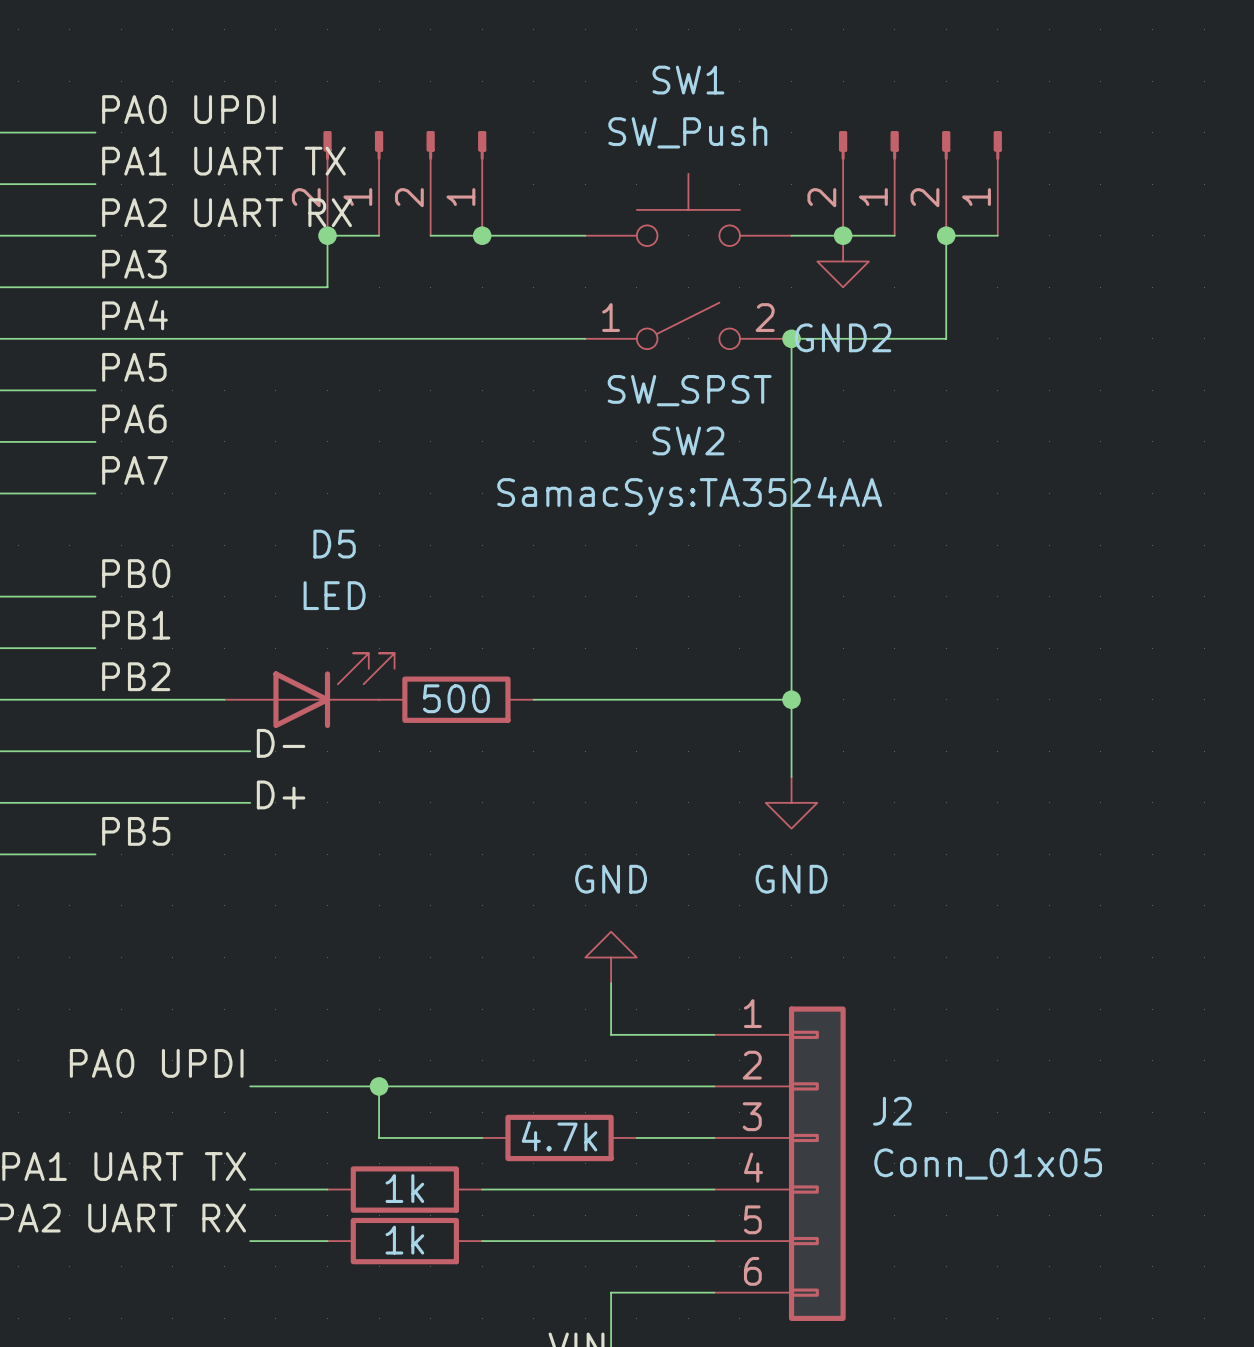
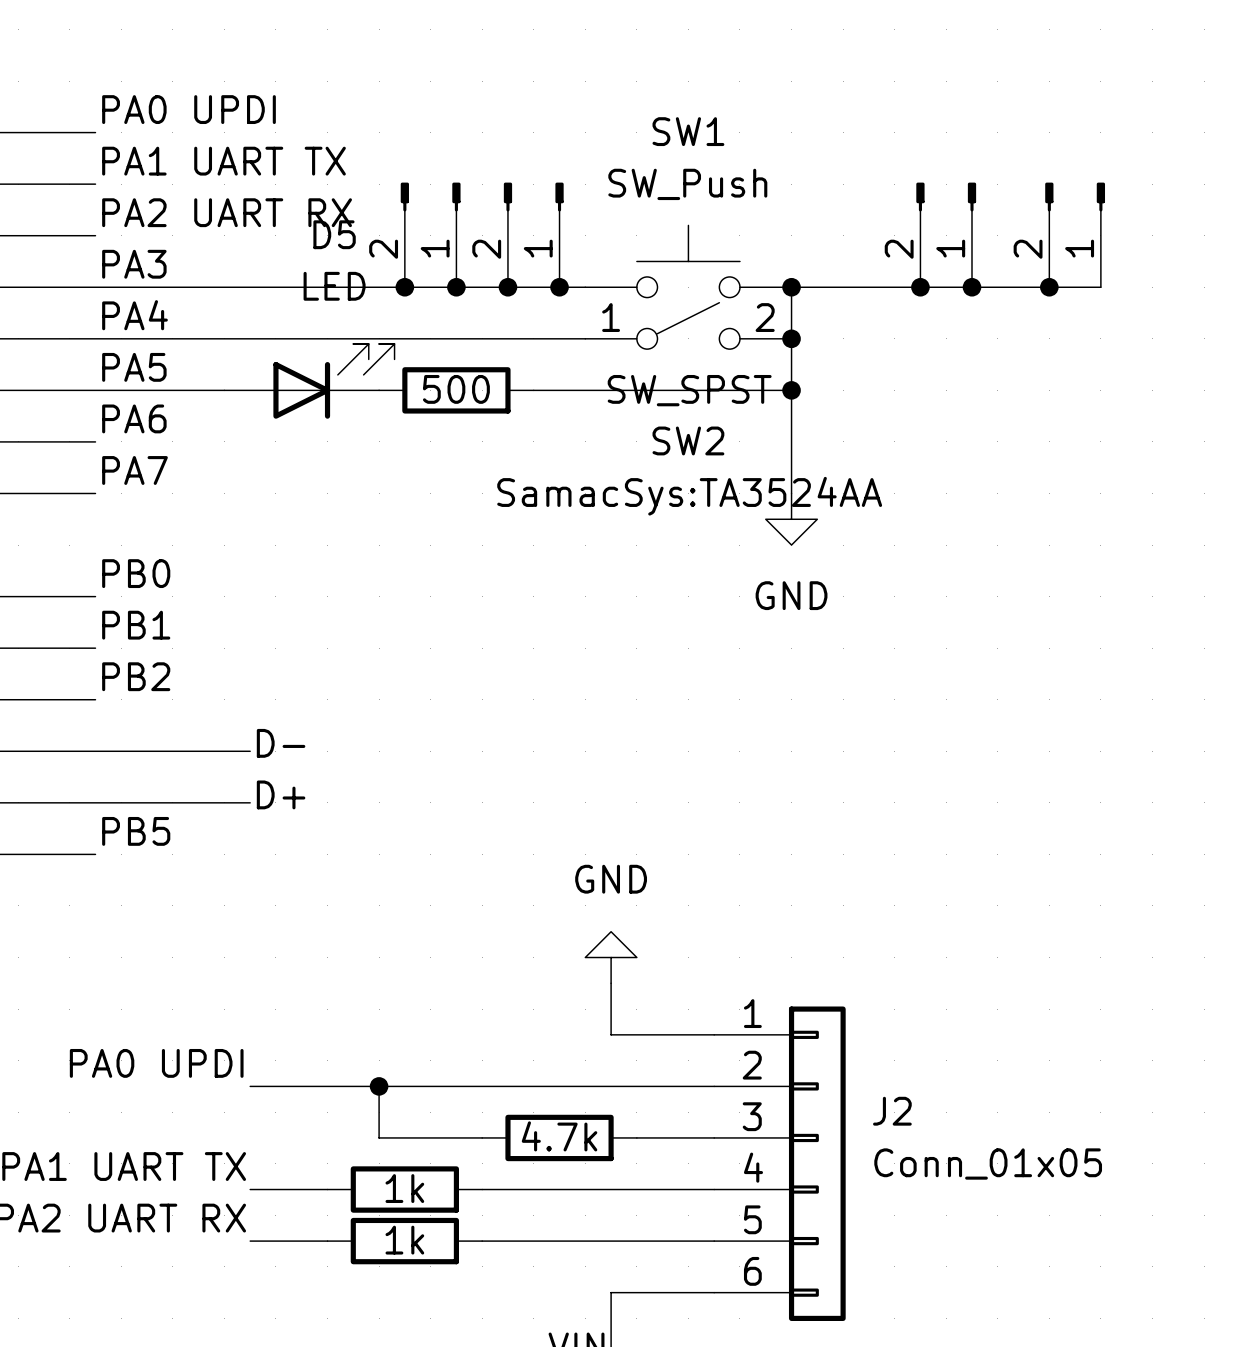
part: (353, 183) -> none
part: (456, 183) -> none
part: (868, 183) -> none
part: (972, 183) -> none
SW1 position: (688, 209) -> (688, 261)
part: none -> (430, 234)
part: none -> (533, 234)
part: none -> (946, 234)
part: none -> (1075, 234)
junction: (327, 235) -> none
wire: (379, 235) (327, 235) (327, 287) -> (585, 287) (327, 287)
wire: (430, 235) (585, 235) -> none
junction: (482, 235) -> none
wire: (791, 235) (894, 235) -> none
junction: (843, 235) -> none
junction: (946, 235) -> none
wire: (997, 235) (946, 235) (946, 338) (791, 338) -> (1100, 287) (791, 287) (791, 338)
power symbol: GND2 (843, 261) -> none
junction: none -> (404, 287)
junction: none -> (456, 287)
junction: none -> (507, 287)
junction: none -> (559, 287)
junction: none -> (791, 287)
junction: none -> (920, 287)
junction: none -> (972, 287)
junction: none -> (1049, 287)
junction: none -> (791, 390)
wire: (791, 493) (791, 777) -> none
D5 position: (309, 690) -> (309, 381)
wire: (95, 699) (224, 699) -> (95, 390) (224, 390)
part position: (456, 699) -> (456, 390)
wire: (533, 699) (791, 699) -> (533, 390) (791, 390)
junction: (791, 699) -> none
power symbol position: GND (791, 802) -> GND (791, 519)

